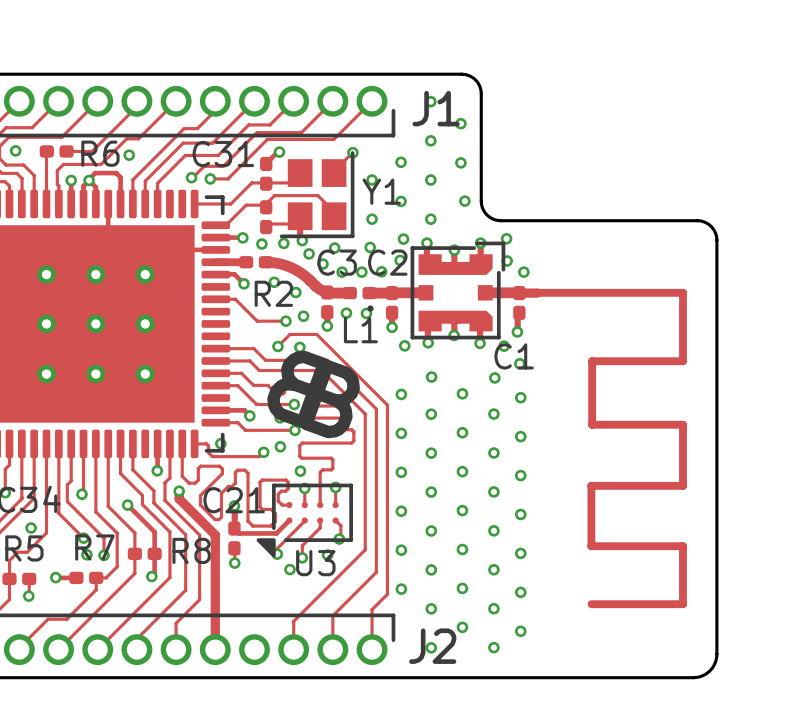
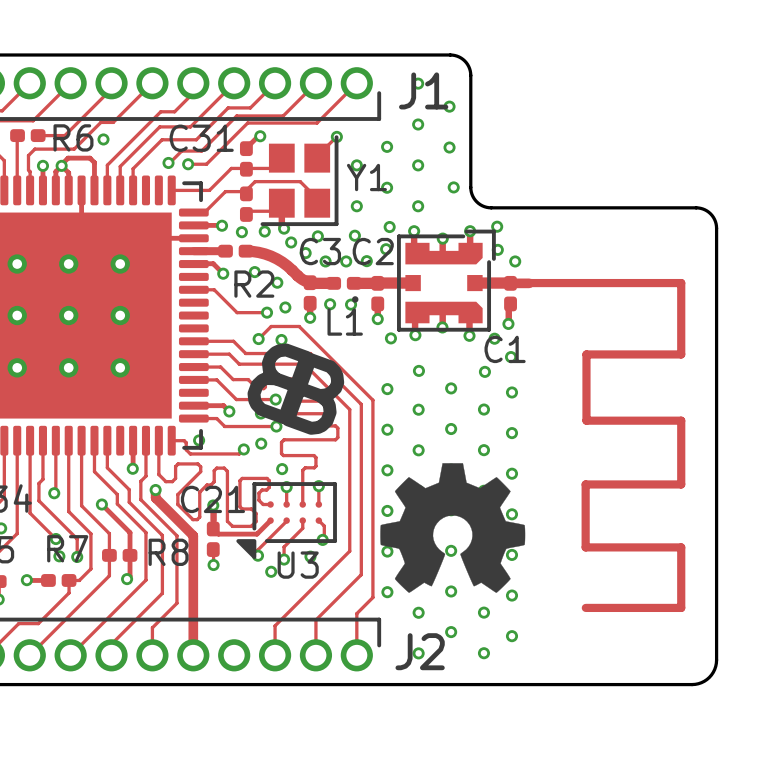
drawing: none -> [380, 463, 526, 593]

